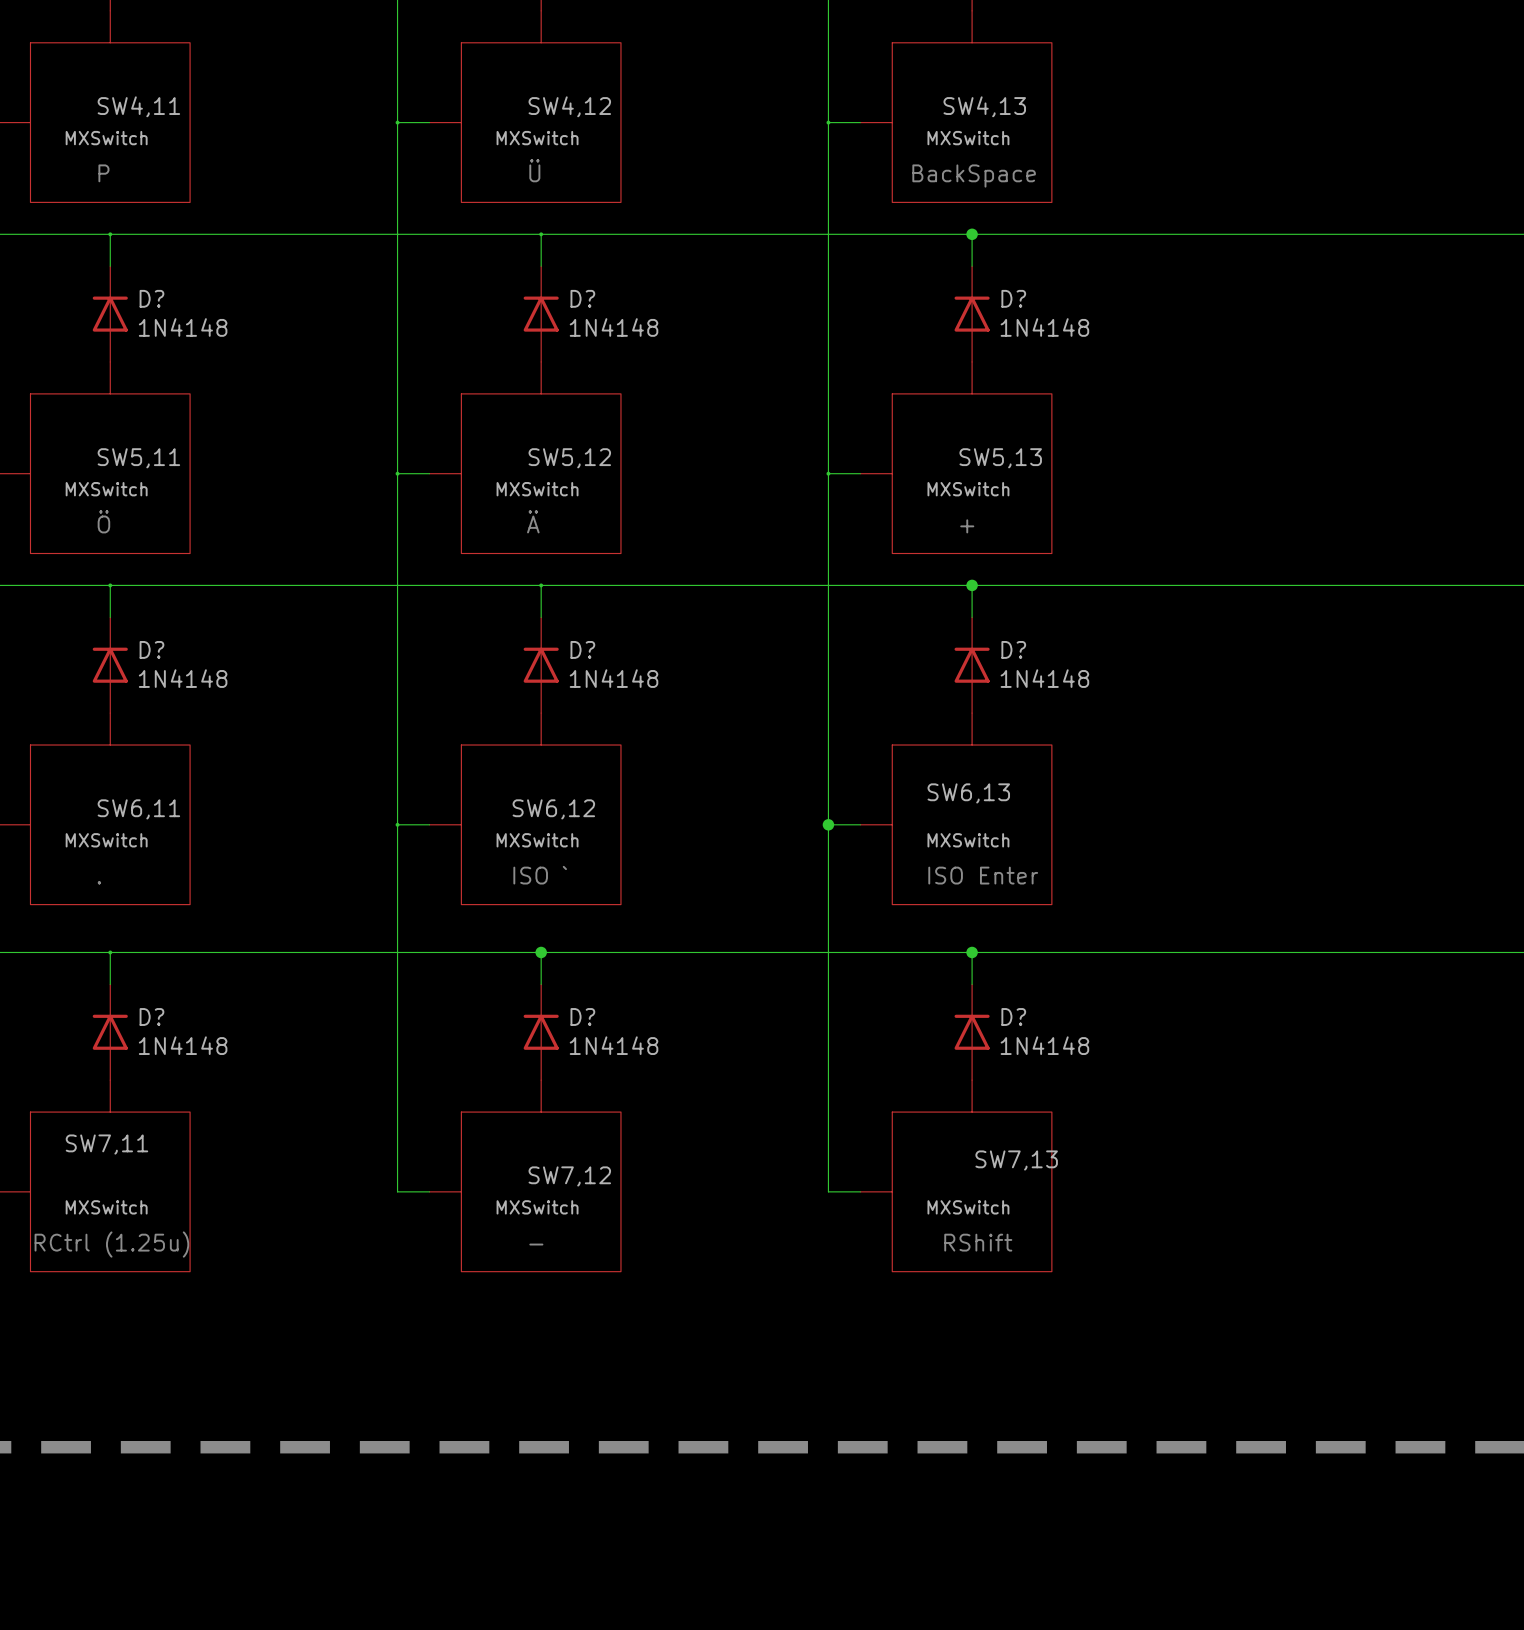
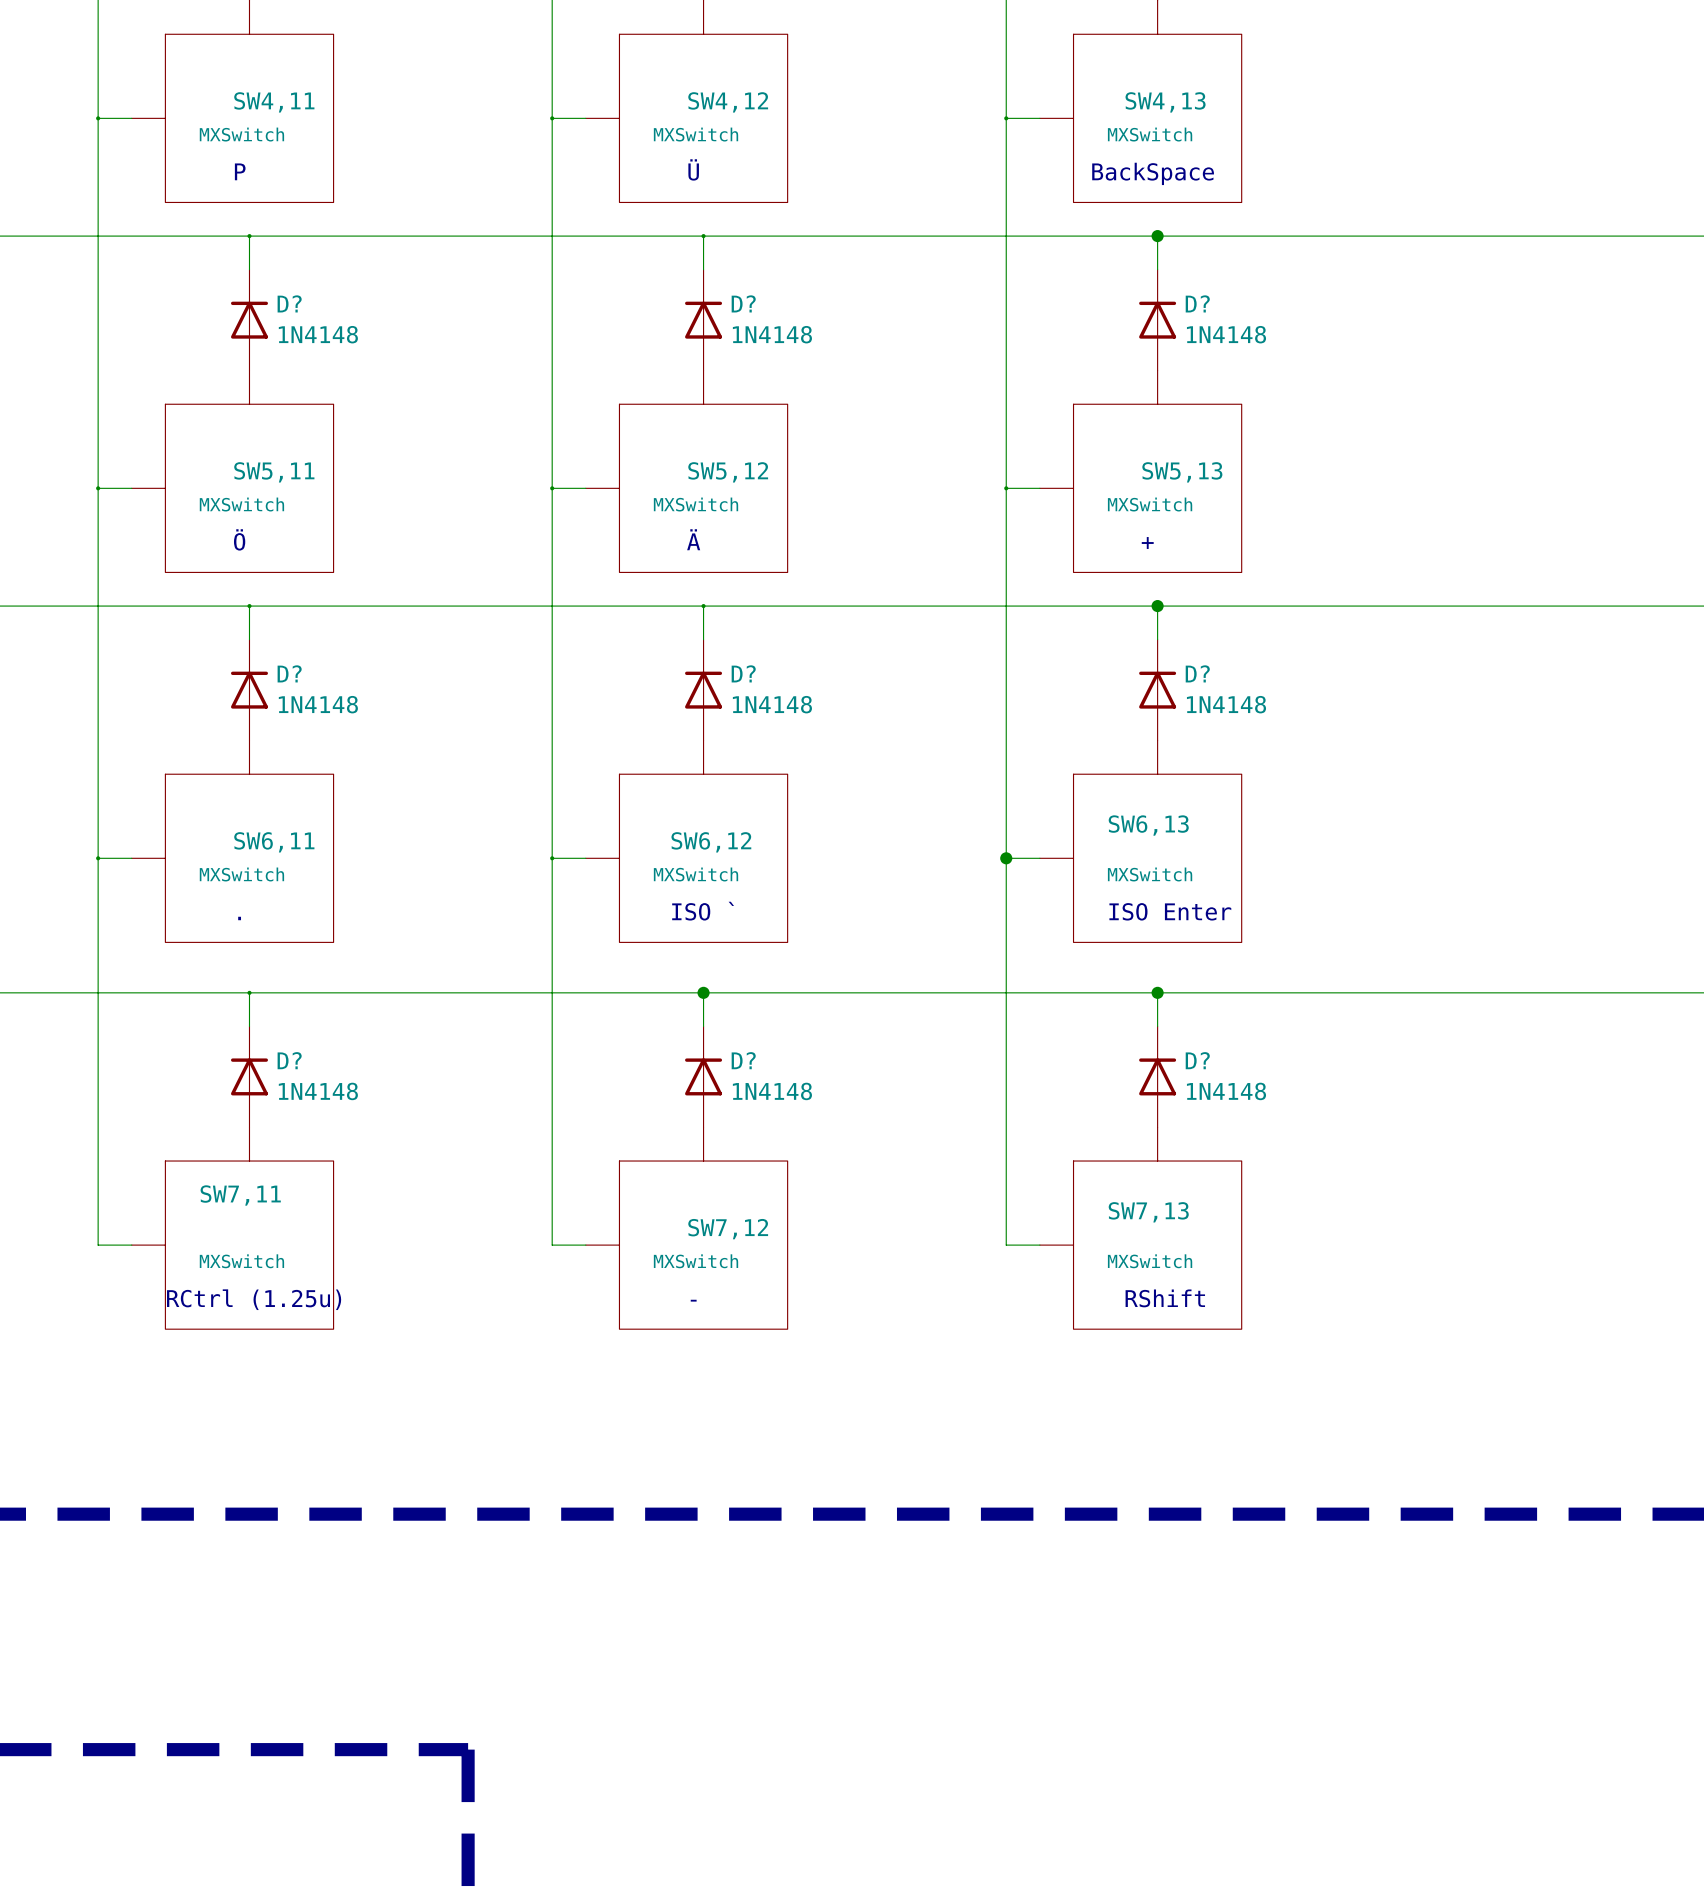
SW7,13 name position: SW7,13 (1016, 1160) -> SW7,13 (1148, 1212)

